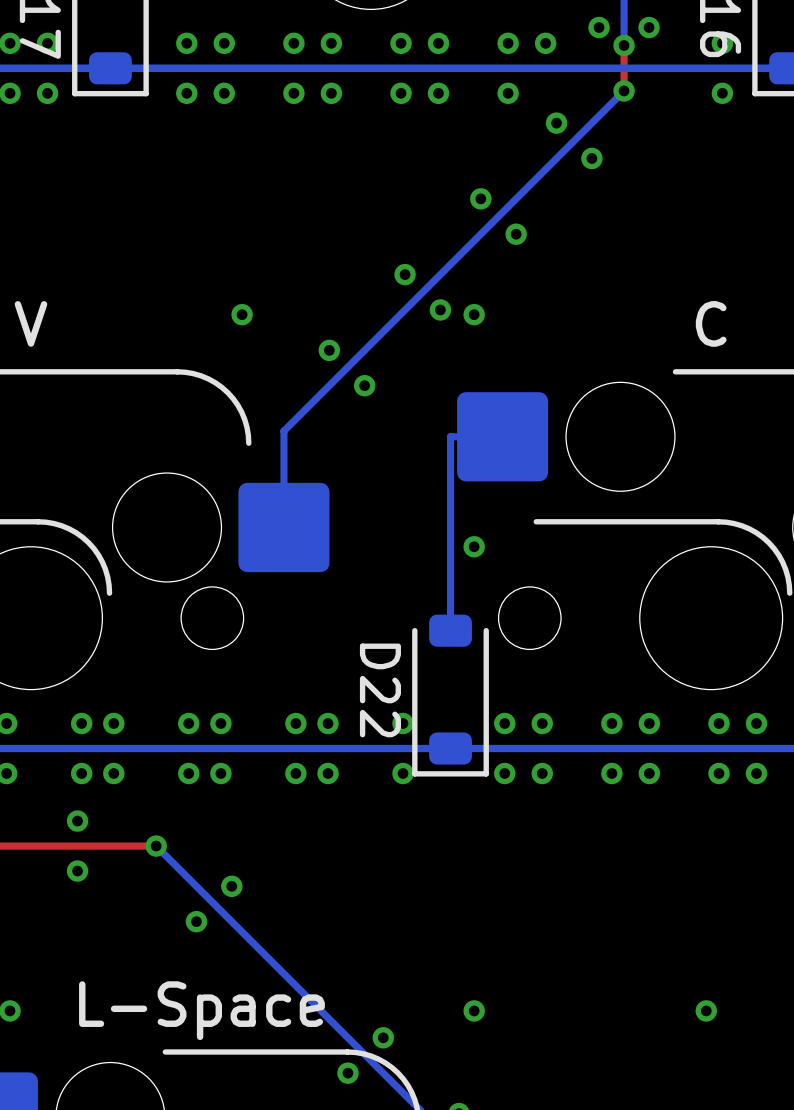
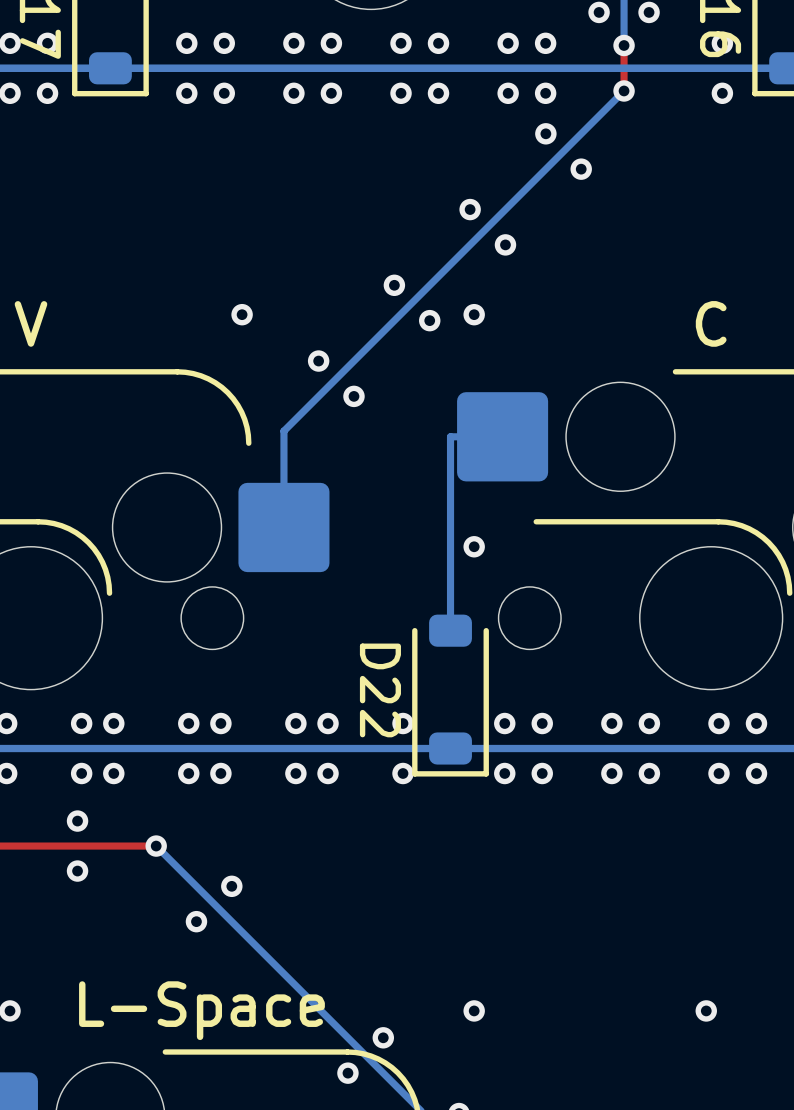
via position: (599, 27) -> (599, 12)
via position: (649, 27) -> (649, 12)
via: none -> (545, 93)
via position: (556, 123) -> (545, 133)
via position: (591, 158) -> (581, 169)
via position: (480, 198) -> (470, 209)
via position: (516, 234) -> (505, 244)
via position: (405, 274) -> (394, 285)
via position: (440, 309) -> (429, 320)
via position: (329, 350) -> (318, 361)
via position: (364, 385) -> (353, 396)

